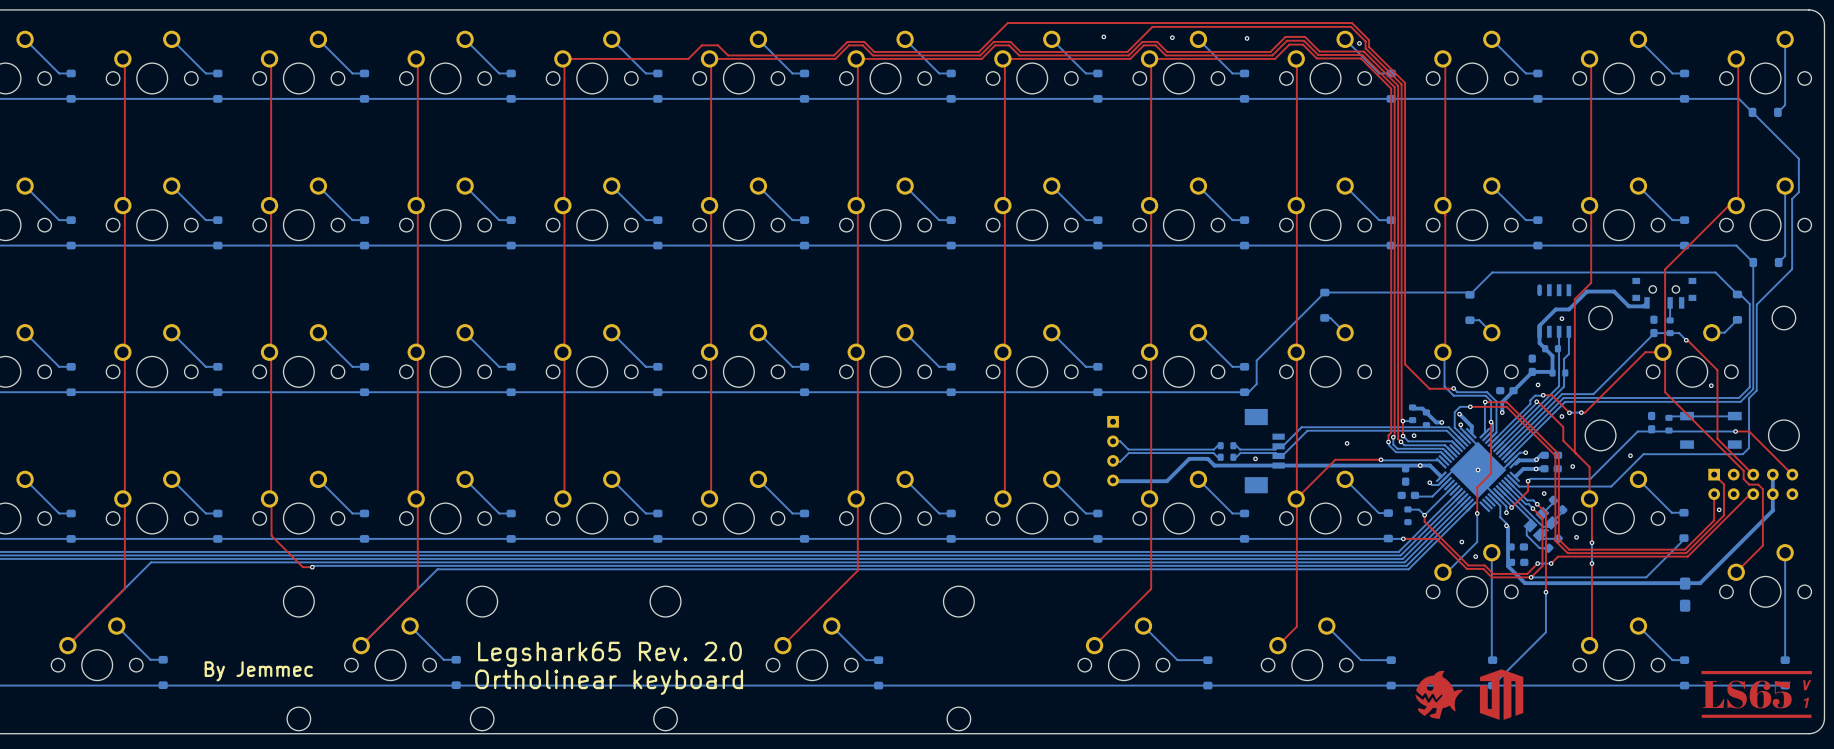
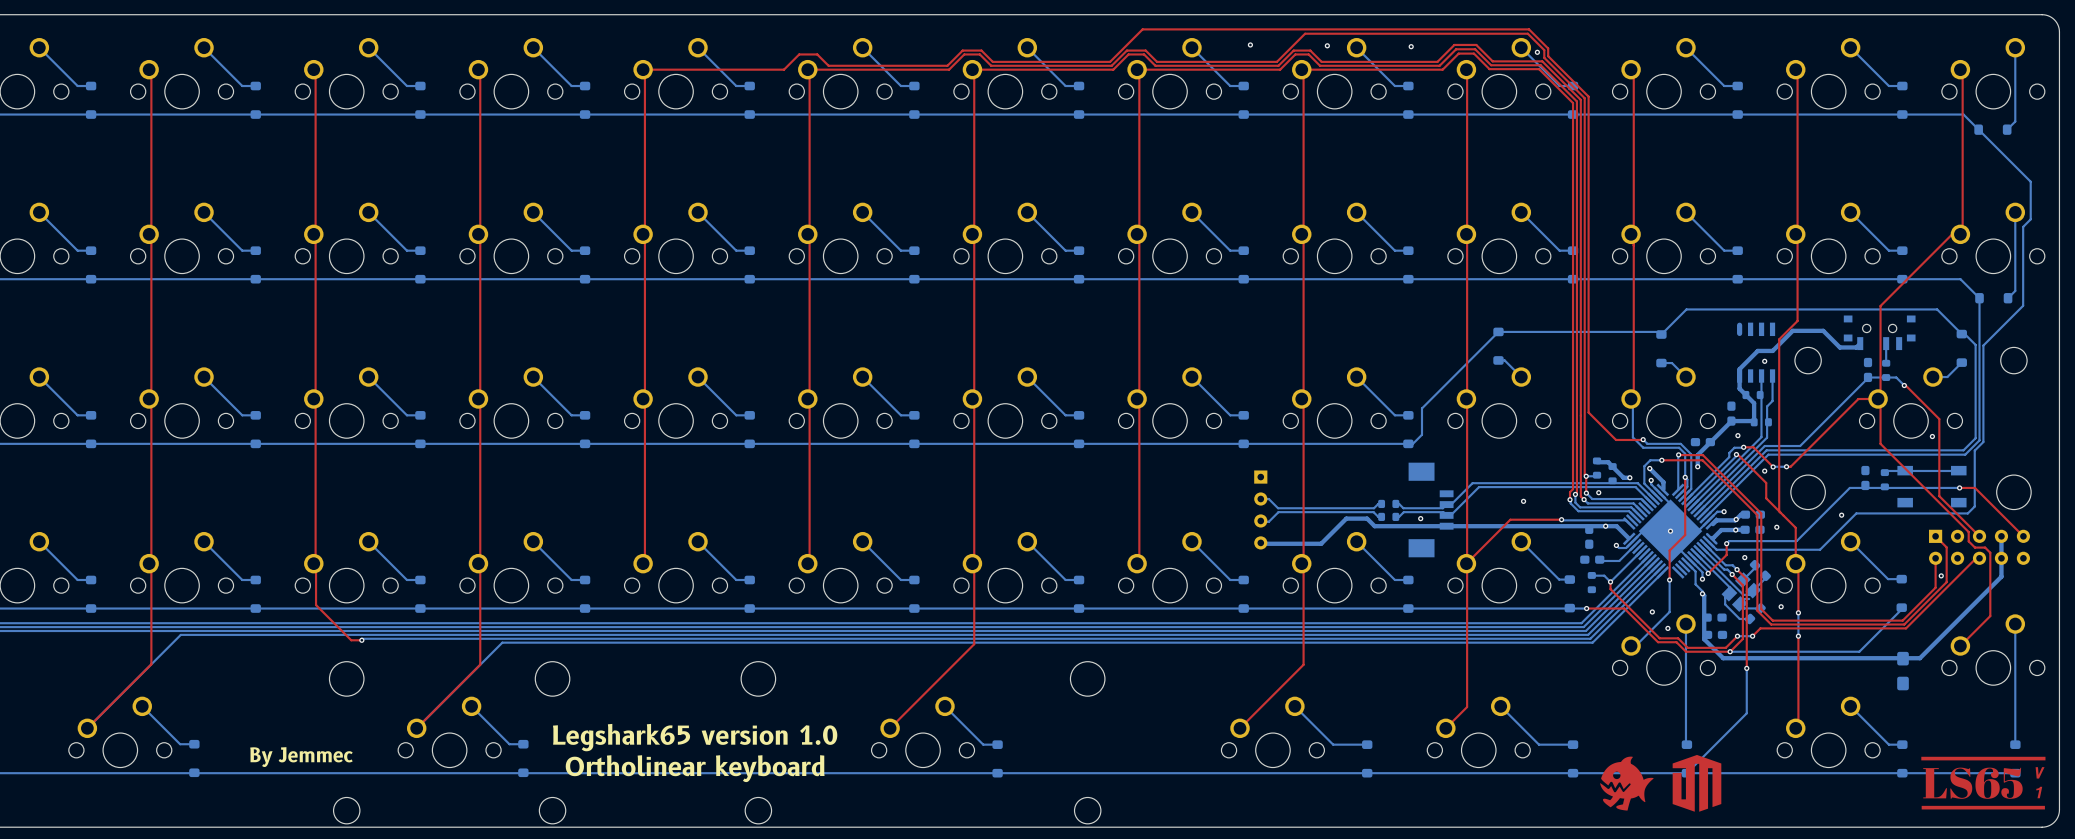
text: Legshark65 Rev. 2.0 (609, 654) -> Legshark65 version 1.0 (695, 737)

